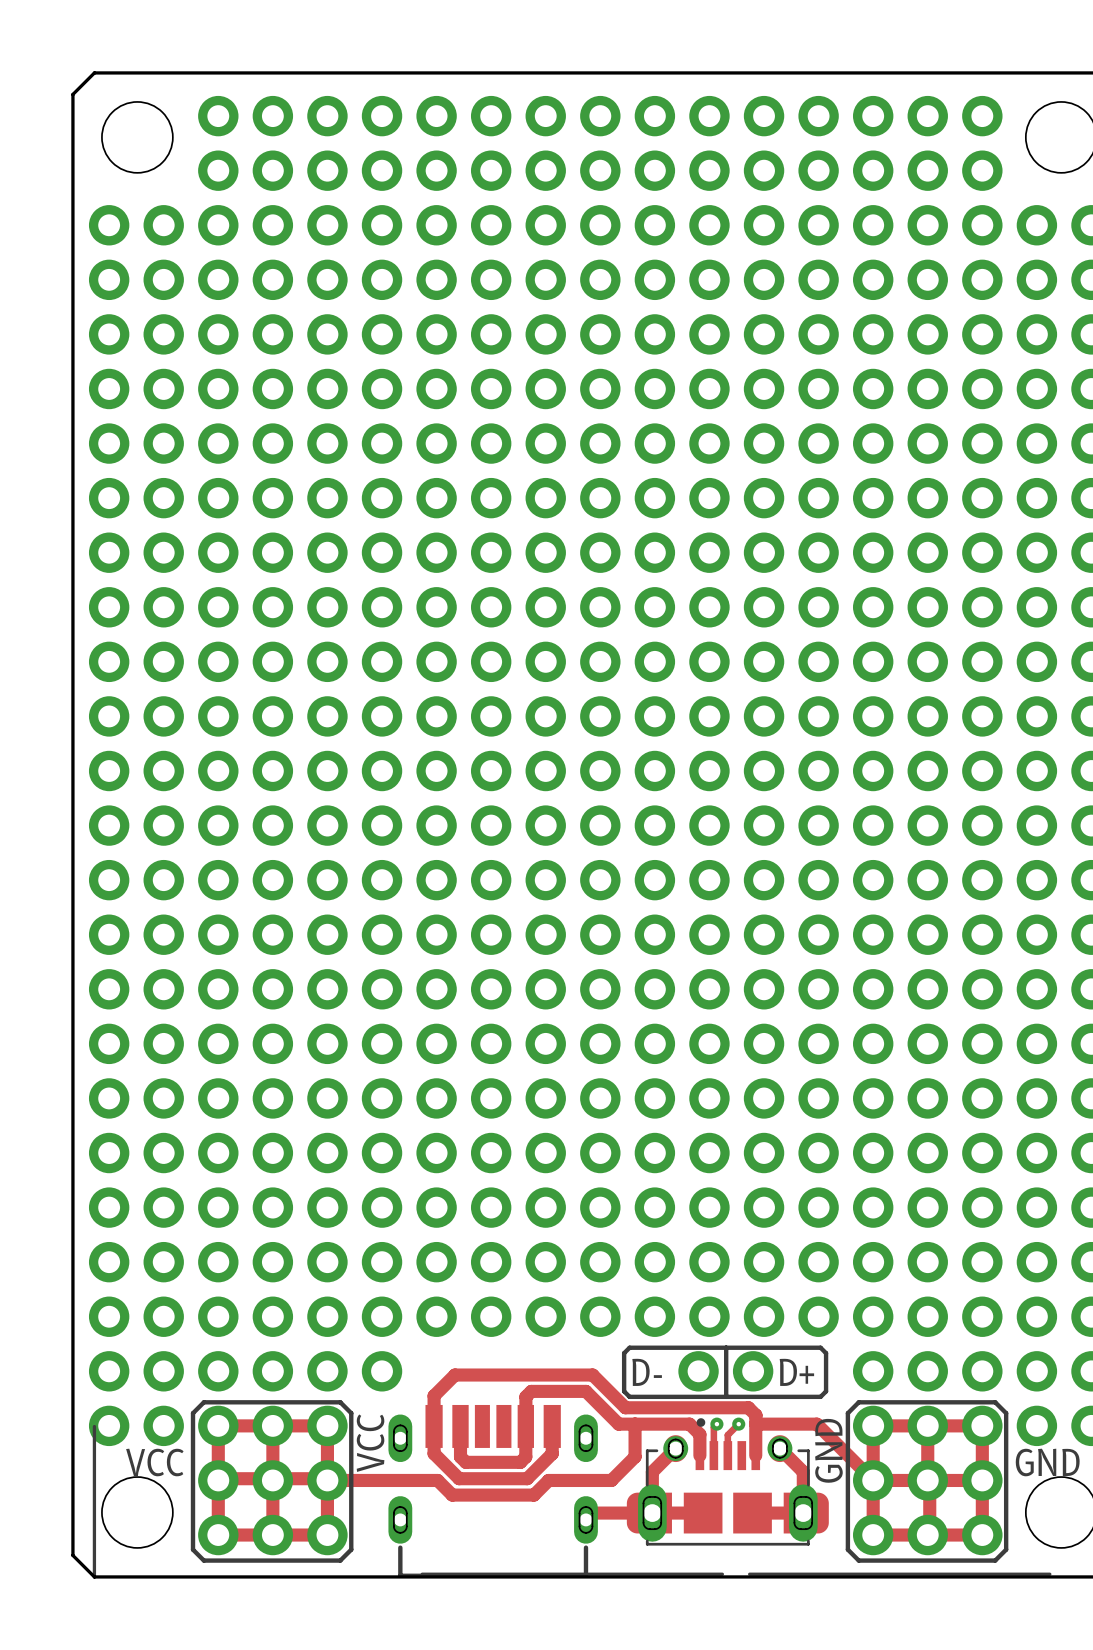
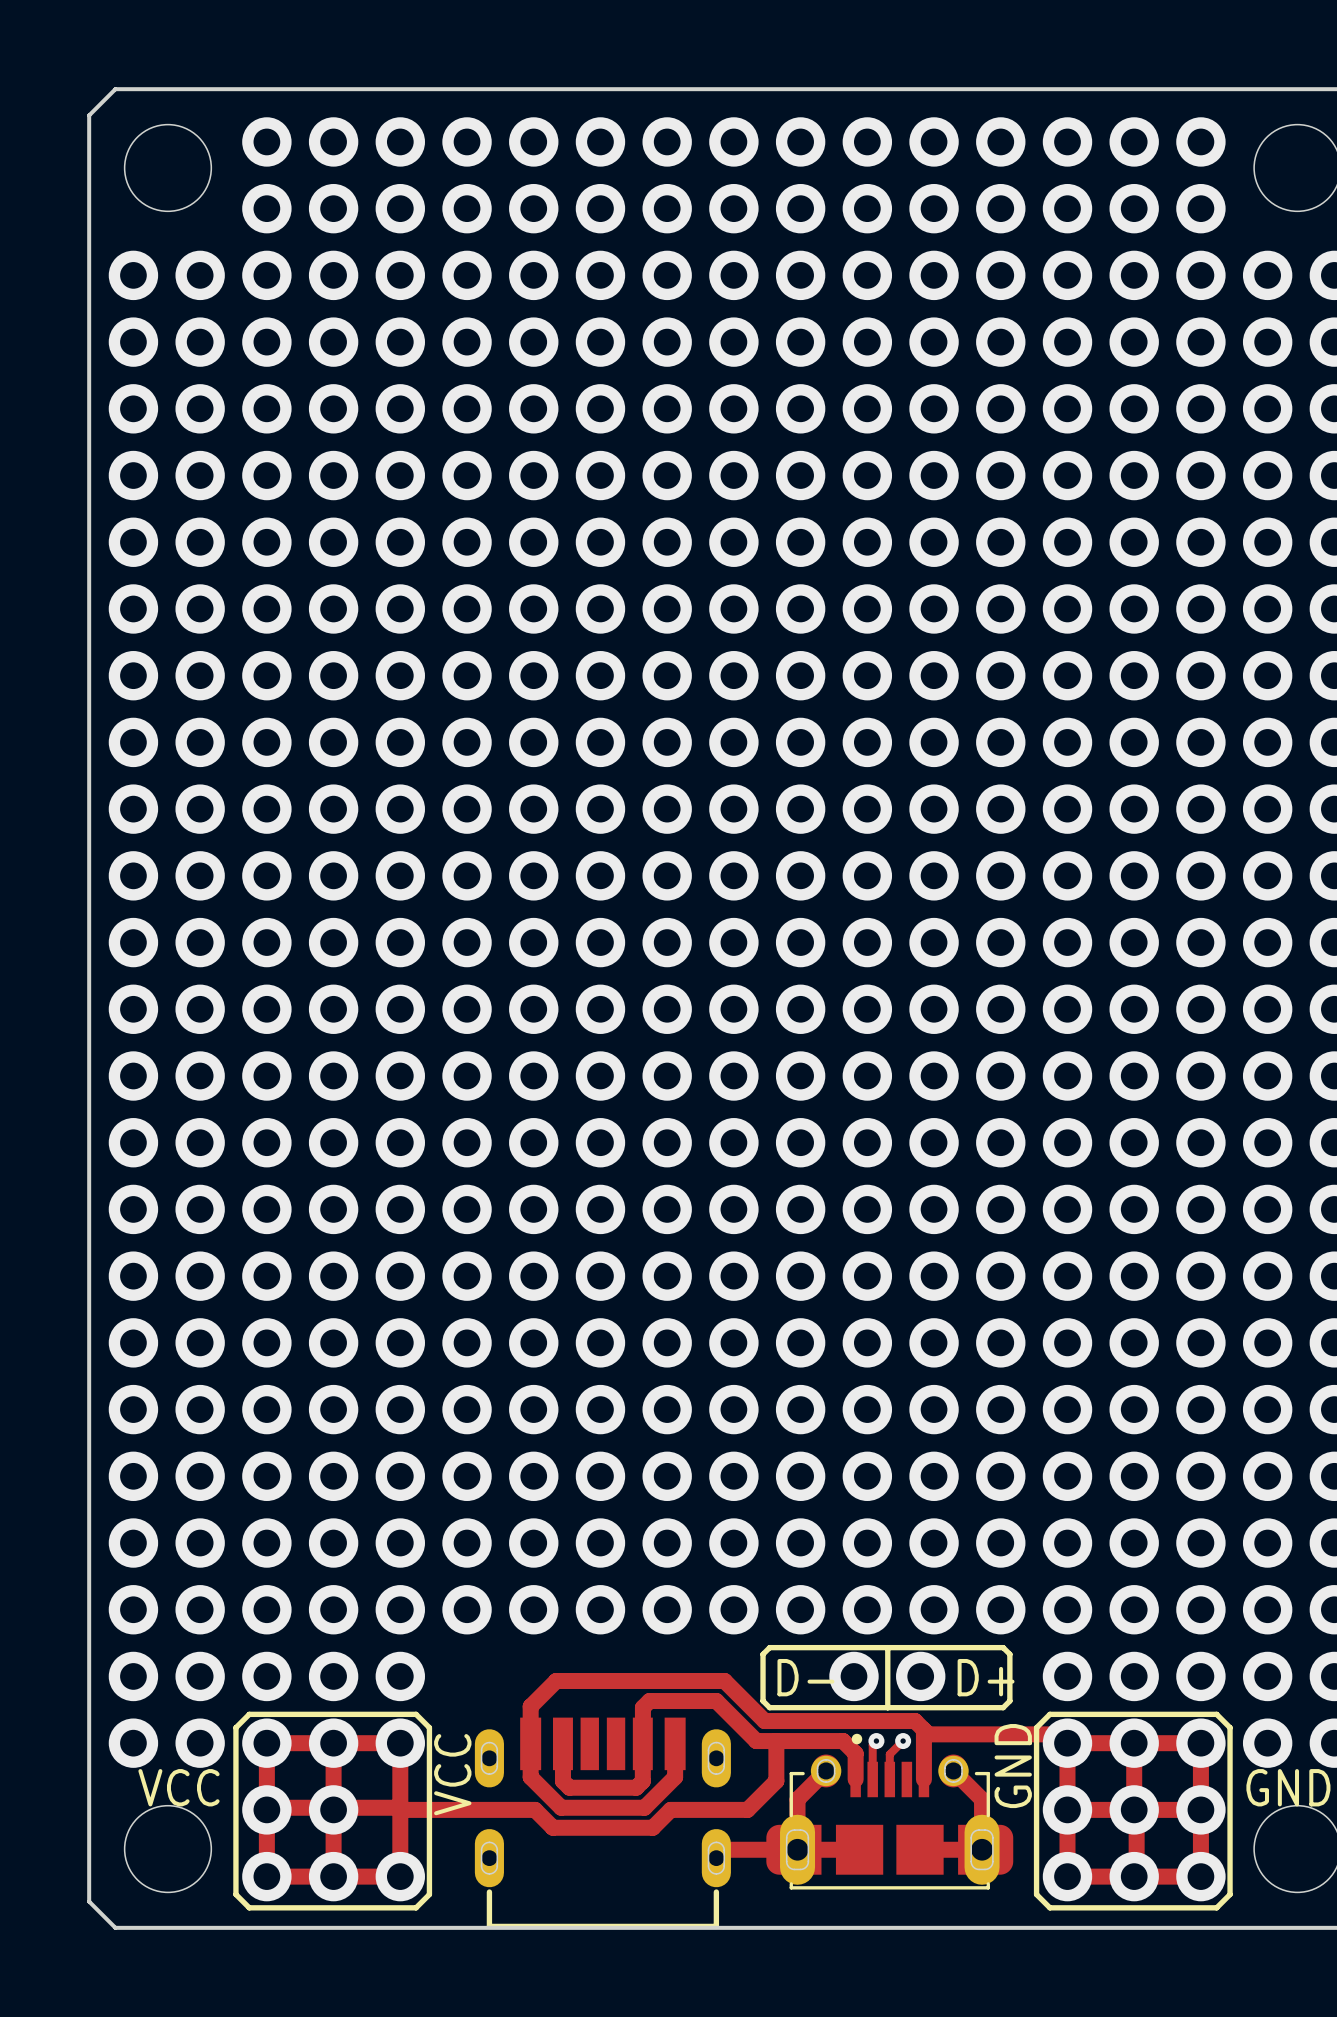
via: (382, 1371) -> none
track: none -> (924, 1730) (928, 1734) (1058, 1734) (1067, 1743)
track: (755, 1424) (816, 1424) (873, 1480) -> none
line: (94, 1426) (94, 1576) -> none
via: (327, 1480) -> none
line: (422, 1574) (722, 1574) -> none
line: (749, 1574) (1049, 1574) -> none

